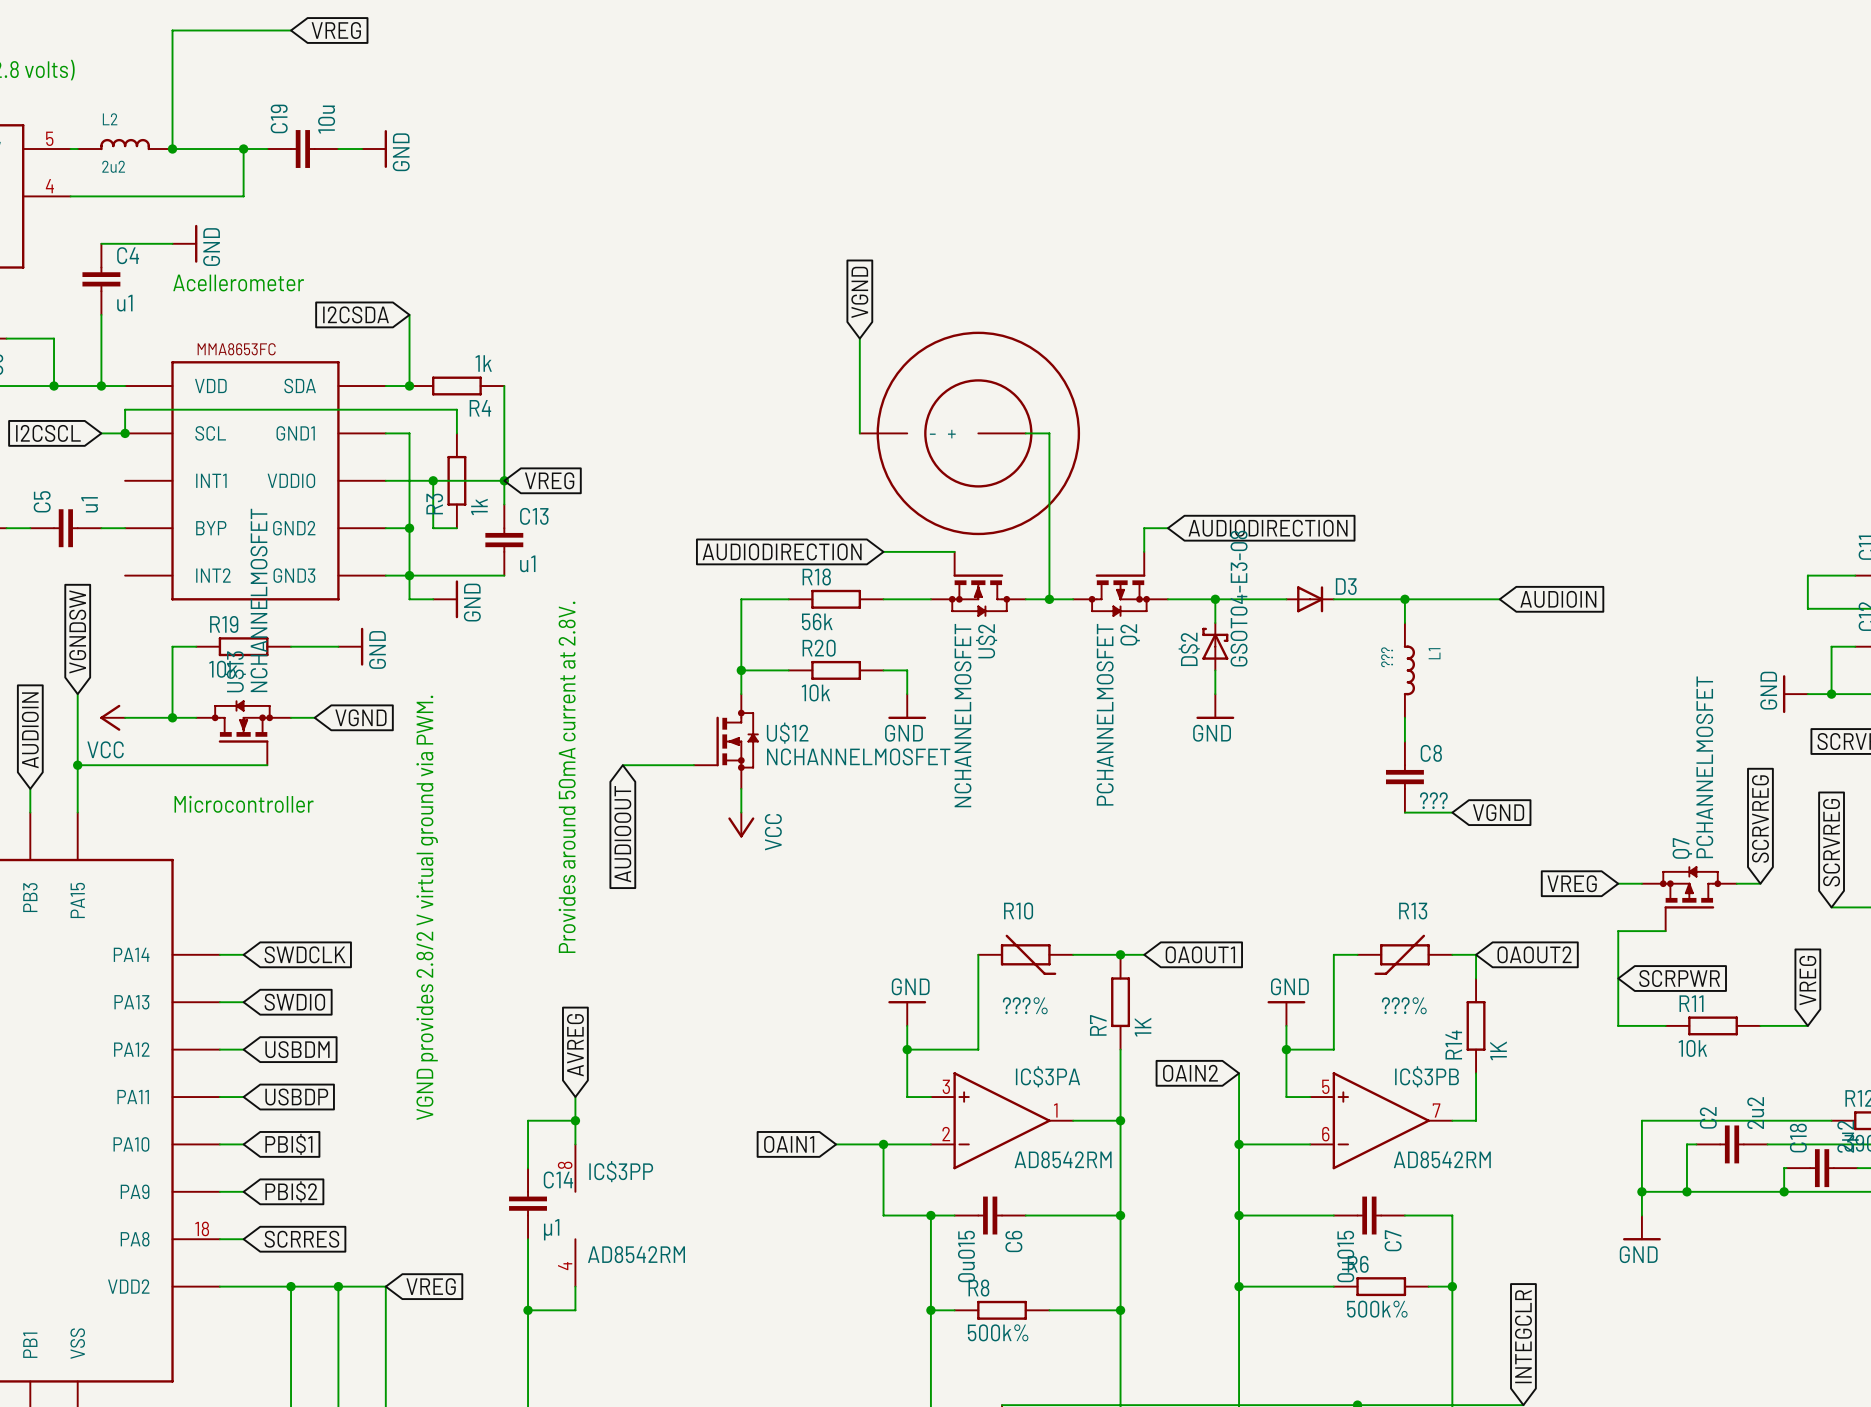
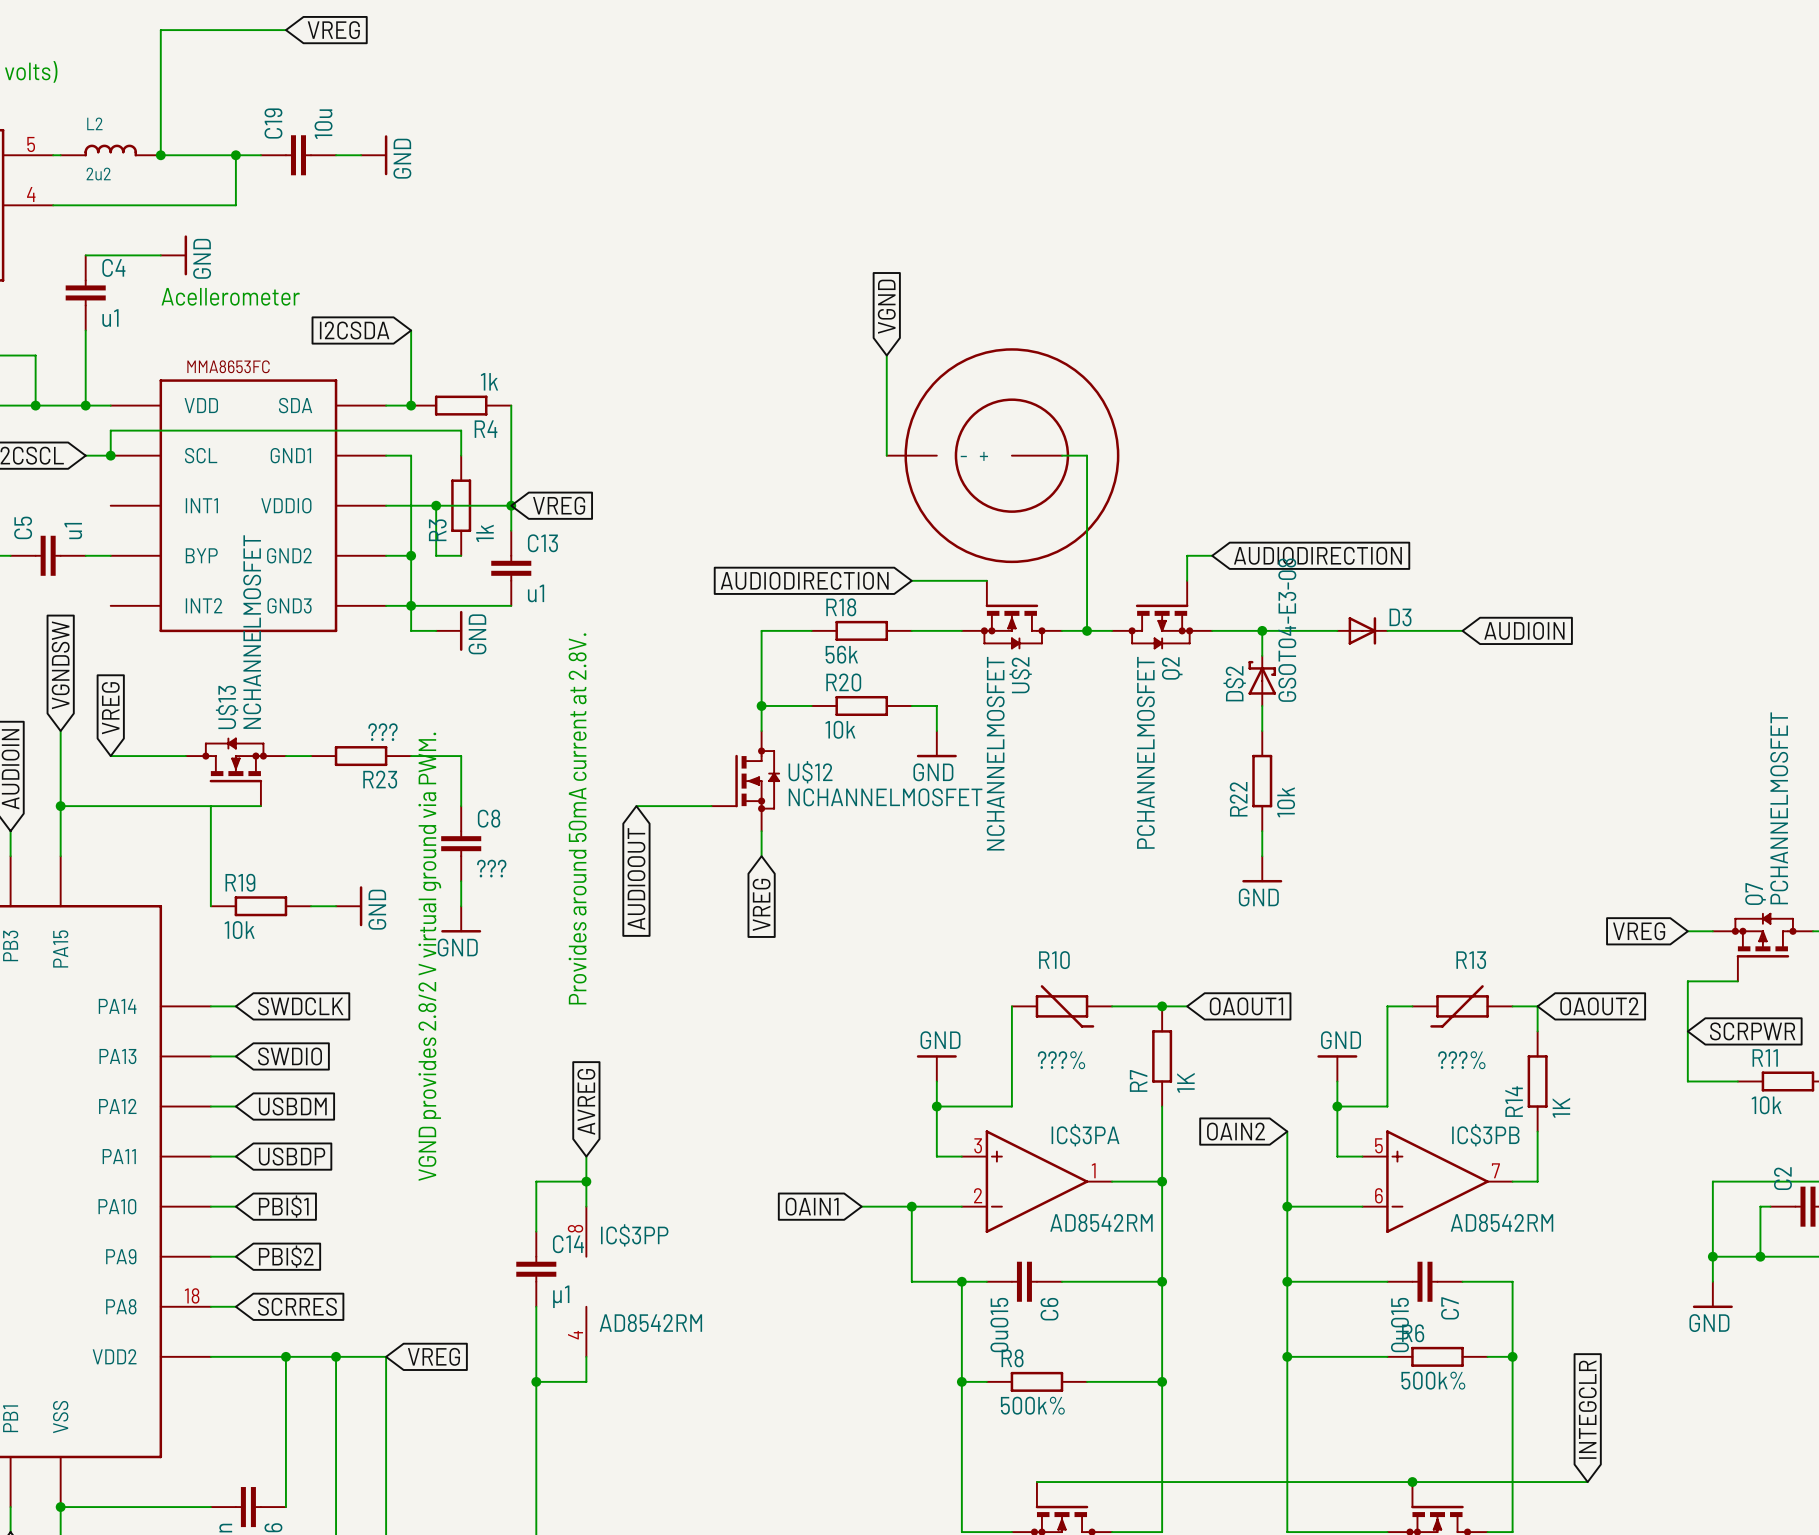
junction: (1404, 599) -> none
wire: (1499, 599) (1404, 599) (1404, 623) -> none
global label position: AUDIOIN (1558, 599) -> AUDIOIN (1524, 630)
wire: (196, 646) (172, 646) (172, 717) -> none
R19 position: (243, 646) -> (260, 906)
wire: (291, 646) (338, 646) -> none
power symbol: GND (350, 646) -> none
L1: ??? (1409, 670) -> none
global label: none -> VREG (110, 708)
power symbol position: GND (1215, 706) -> GND (1262, 869)
power symbol: VCC (112, 717) -> none
junction: (172, 717) -> none
global label: VGND (360, 717) -> none
R23: none -> ??? (361, 756)
wire: none -> (411, 756) (461, 756) (461, 806)
wire: (1404, 717) (1404, 741) -> (1262, 831) (1262, 856)
R22: none -> 10k (1262, 781)
wire: none -> (210, 806) (210, 906)
C8 position: (1404, 777) -> (461, 843)
text: Microcontroller (244, 804) -> none
wire: (1404, 812) (1452, 812) -> none
global label: VGND (1498, 812) -> none
power symbol: VCC (741, 825) -> none
wire: none -> (461, 881) (461, 906)
global label: none -> VREG (761, 904)
wire: none -> (311, 906) (336, 906)
power symbol: none -> GND (349, 906)
power symbol: none -> GND (461, 919)

